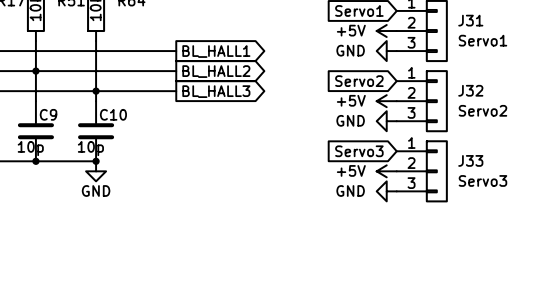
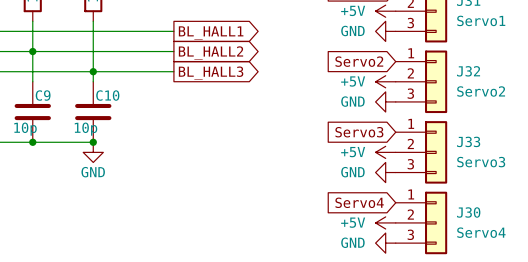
global label: none -> Servo4 (359, 202)
power symbol: none -> +5V (385, 222)
J30: none -> Servo4 (421, 222)
power symbol: none -> GND (385, 243)

